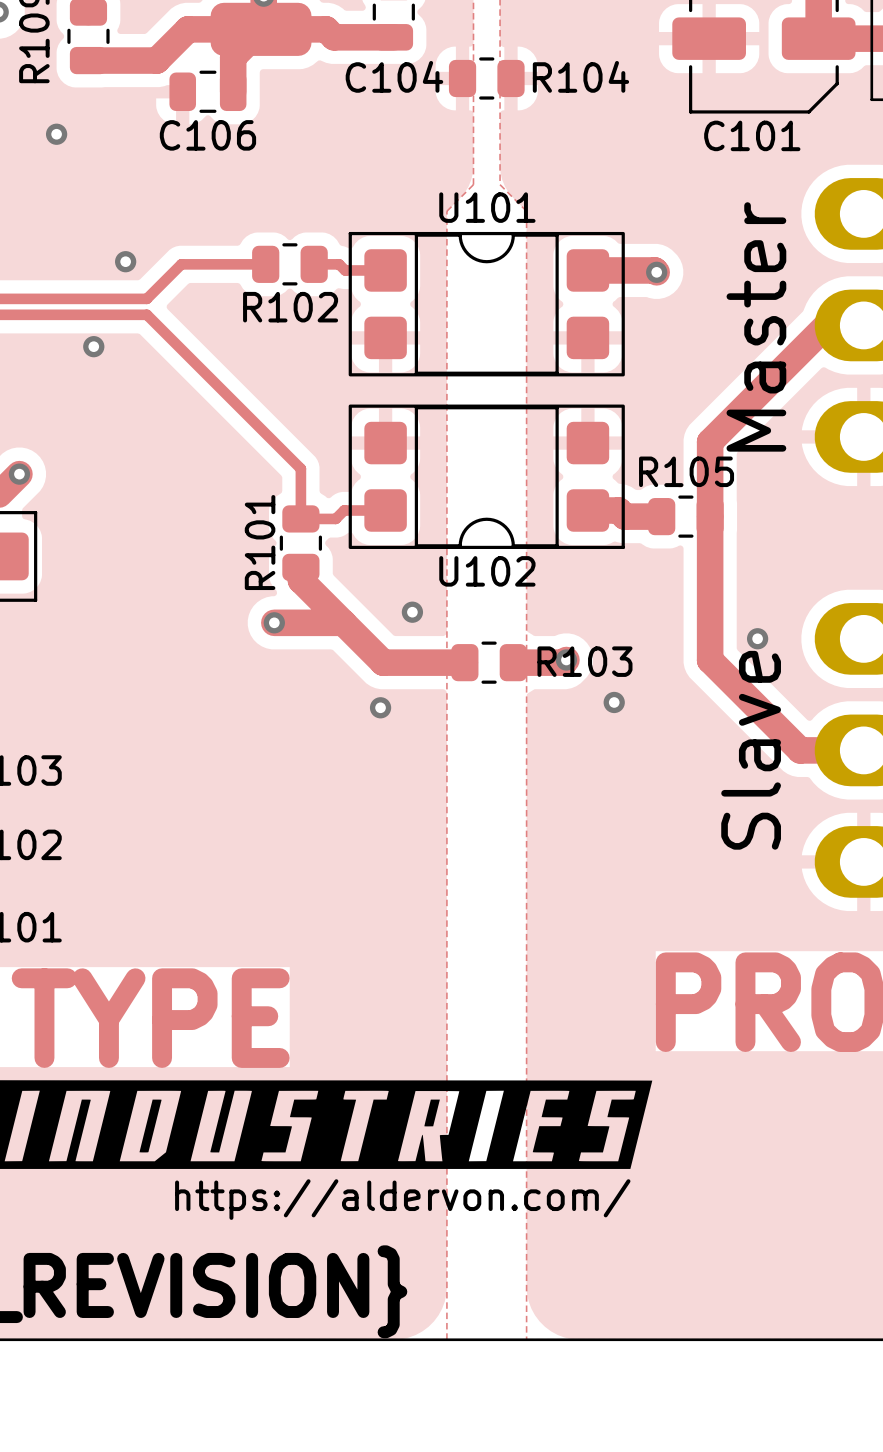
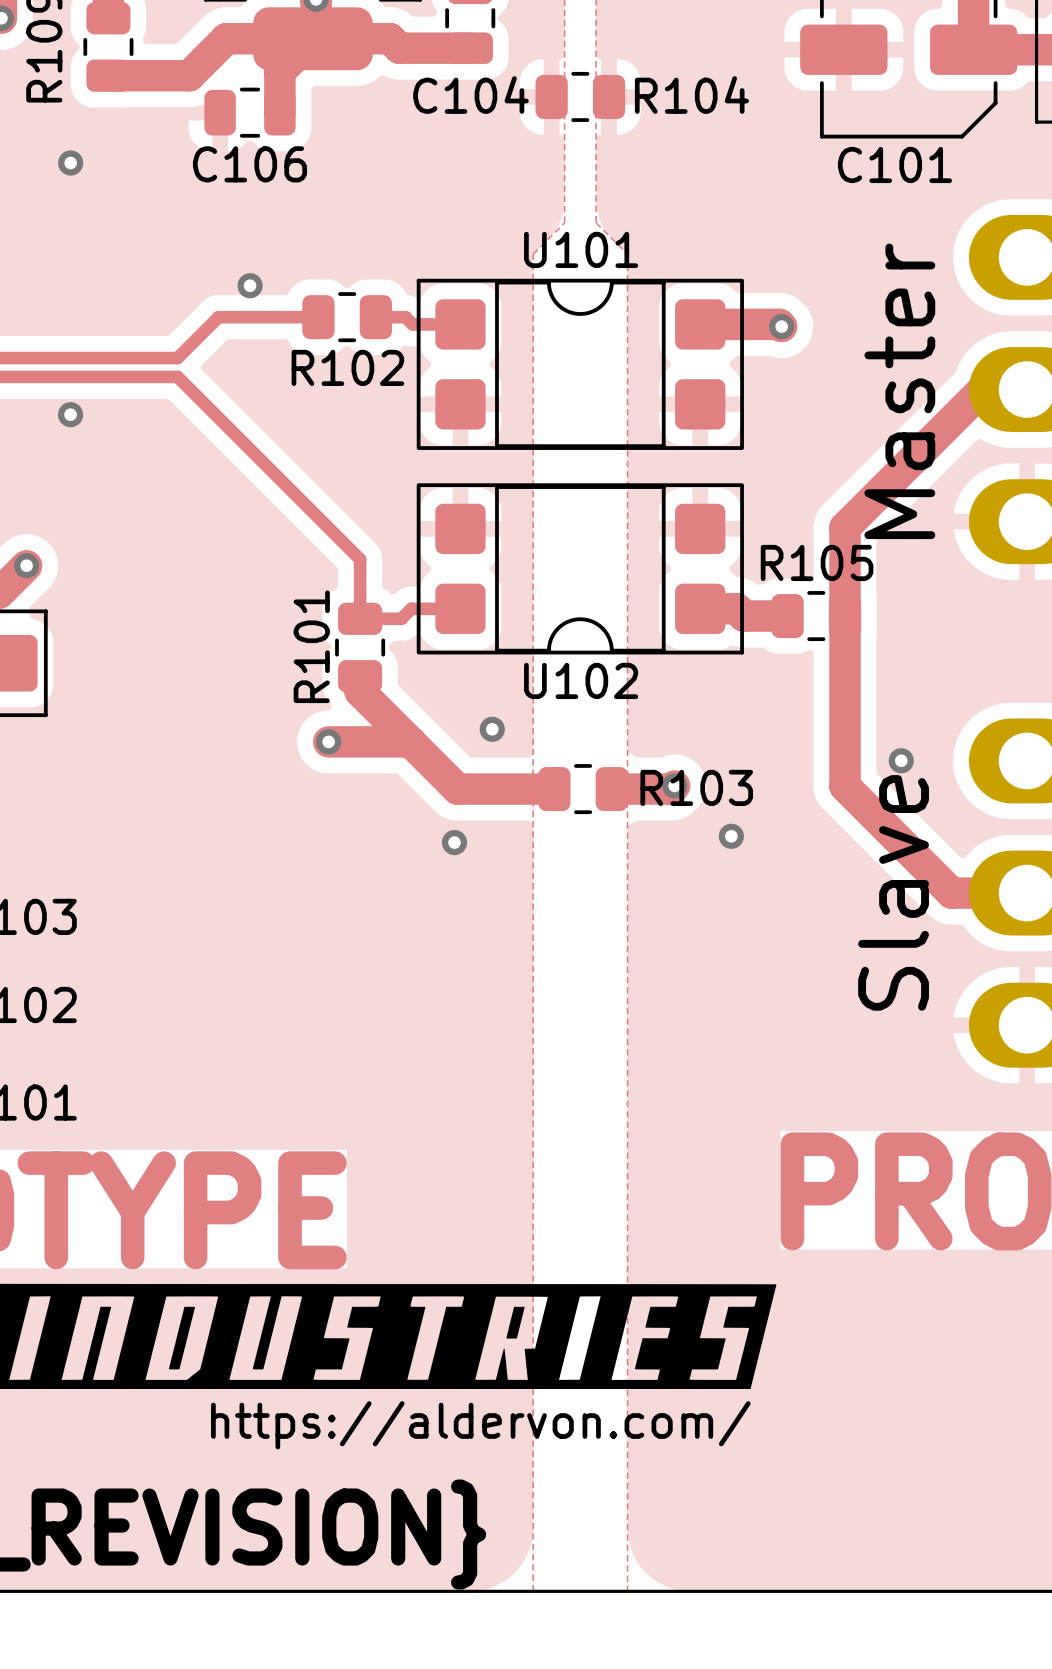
via: none -> (250, 285)
via: (125, 261) -> none
via position: (93, 346) -> (70, 414)

